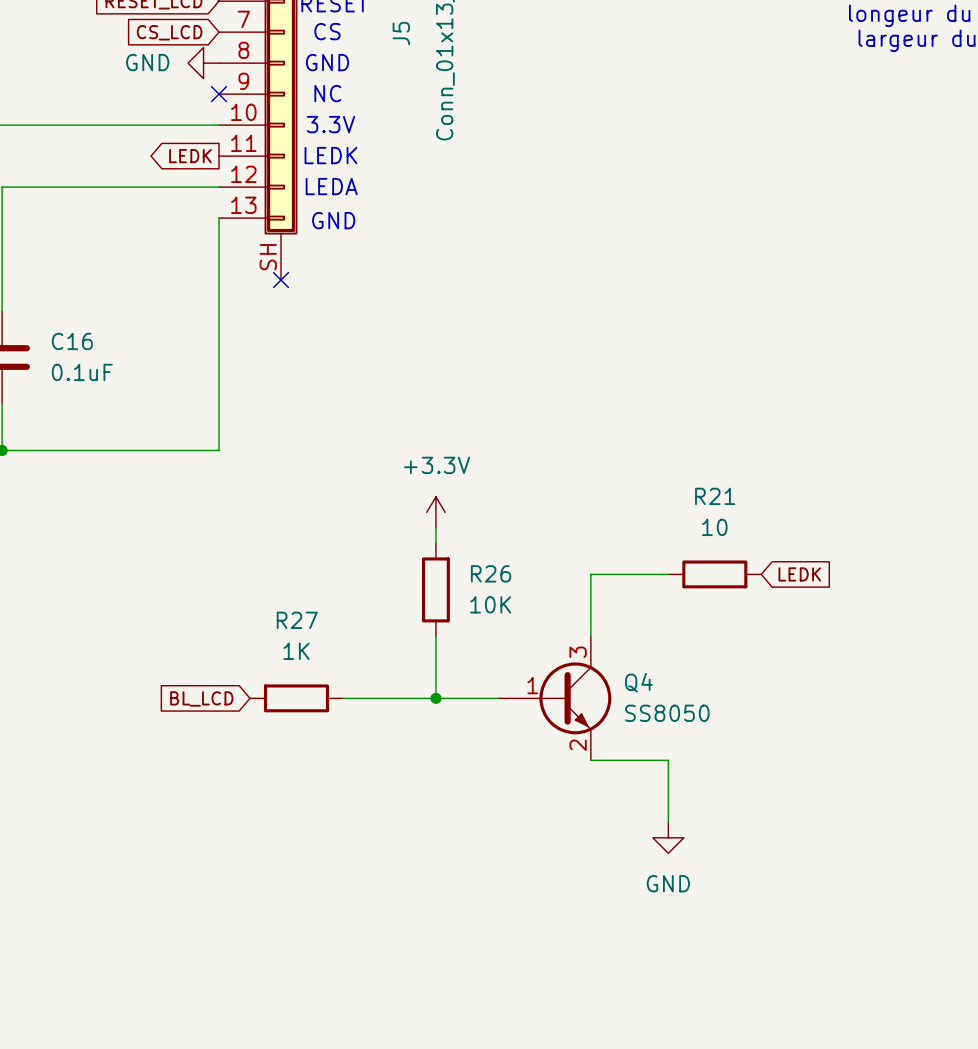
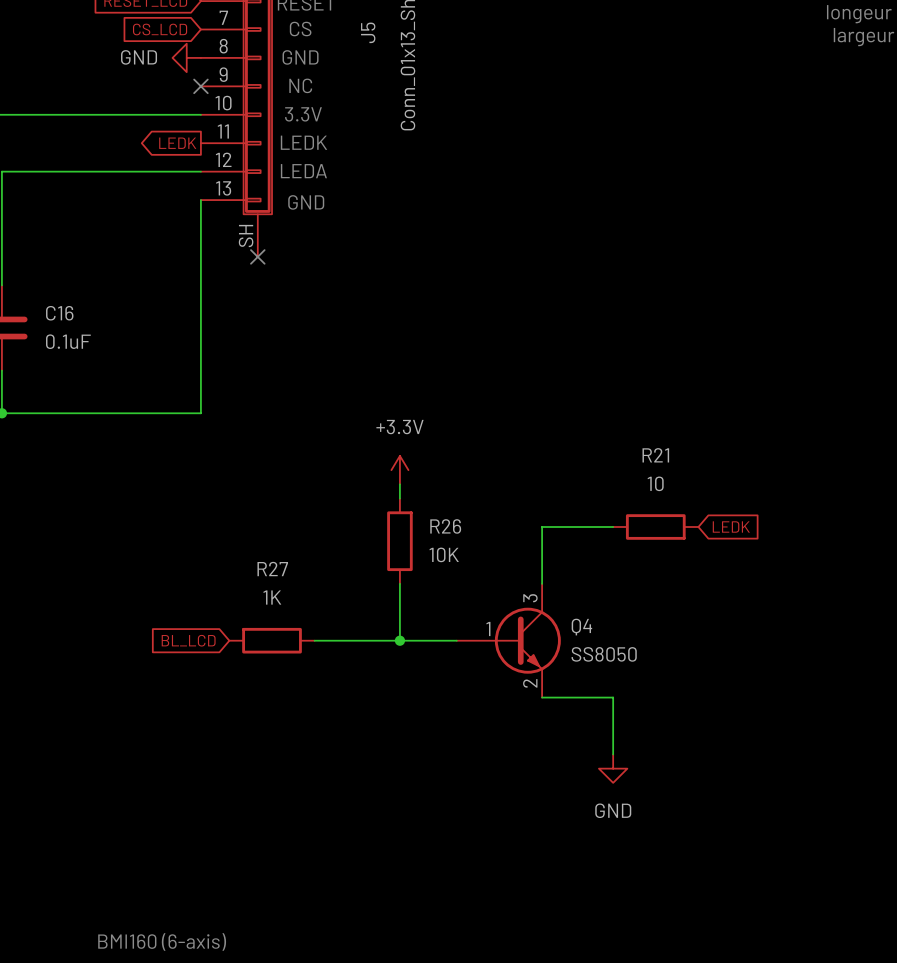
text: none -> BMI160 (6-axis) (162, 941)

